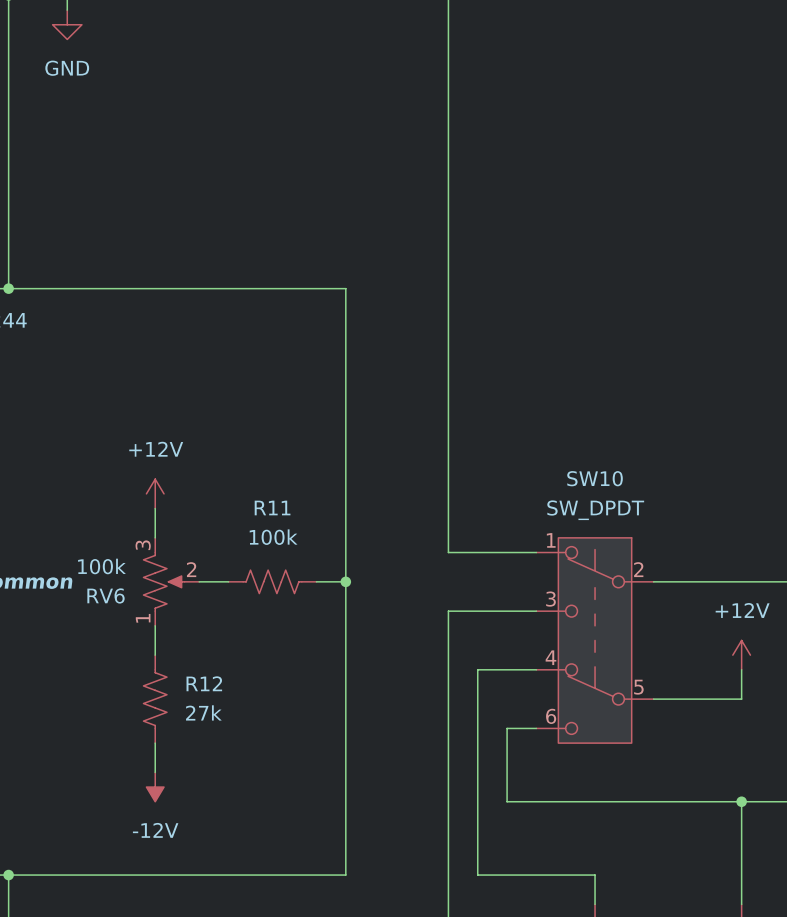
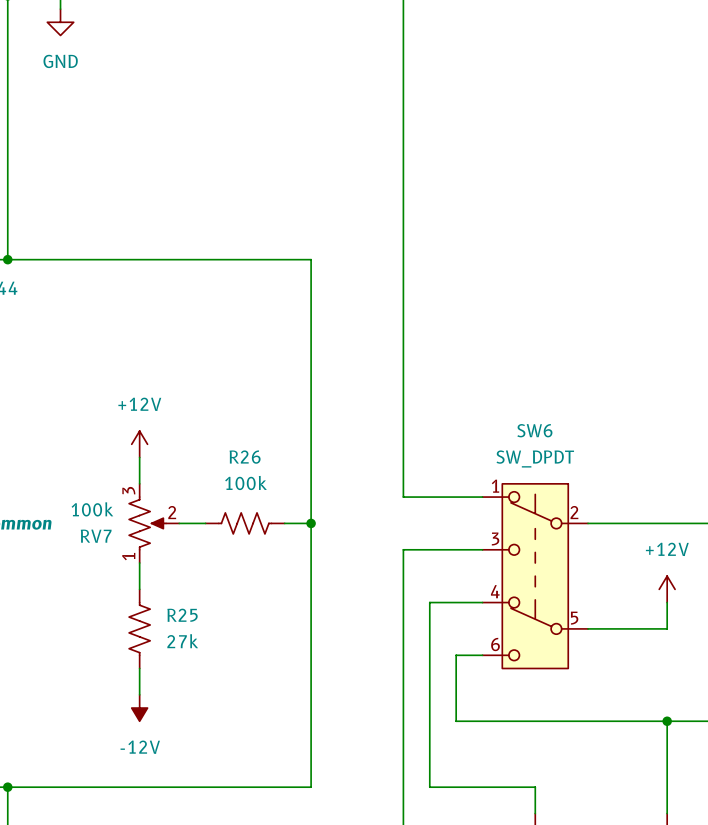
SW10 name: SW10 (595, 478) -> SW6 (534, 430)
R11 name: R11 (272, 508) -> R26 (245, 457)
RV6 name: RV6 (106, 595) -> RV7 (96, 536)
R12 name: R12 (204, 683) -> R25 (182, 615)

